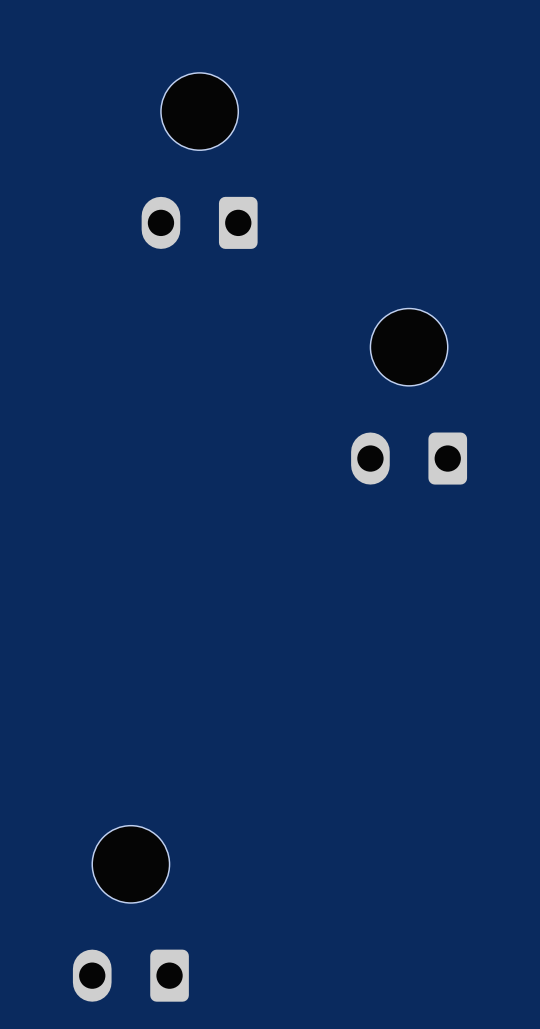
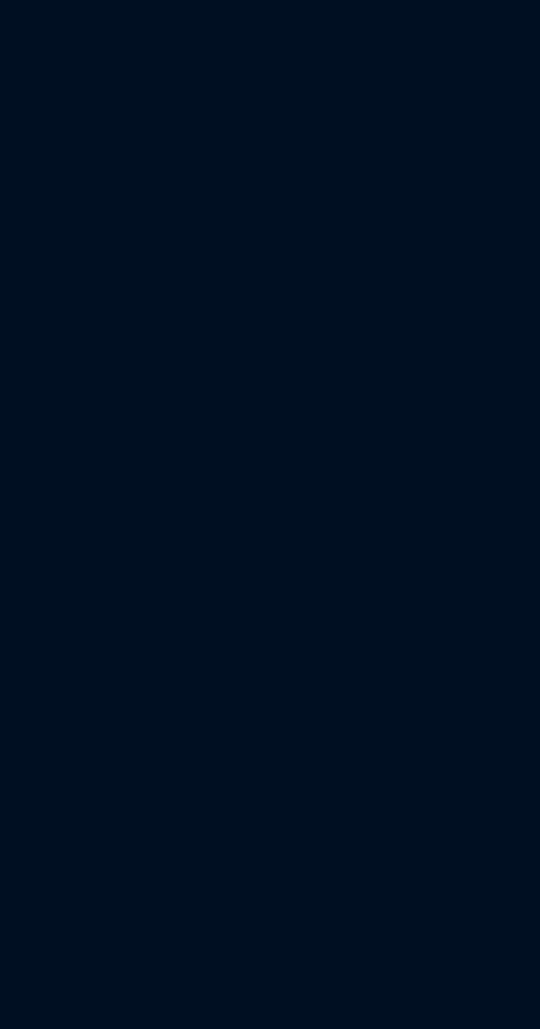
part: (199, 160) -> none
part: (409, 396) -> none
part: (130, 913) -> none

